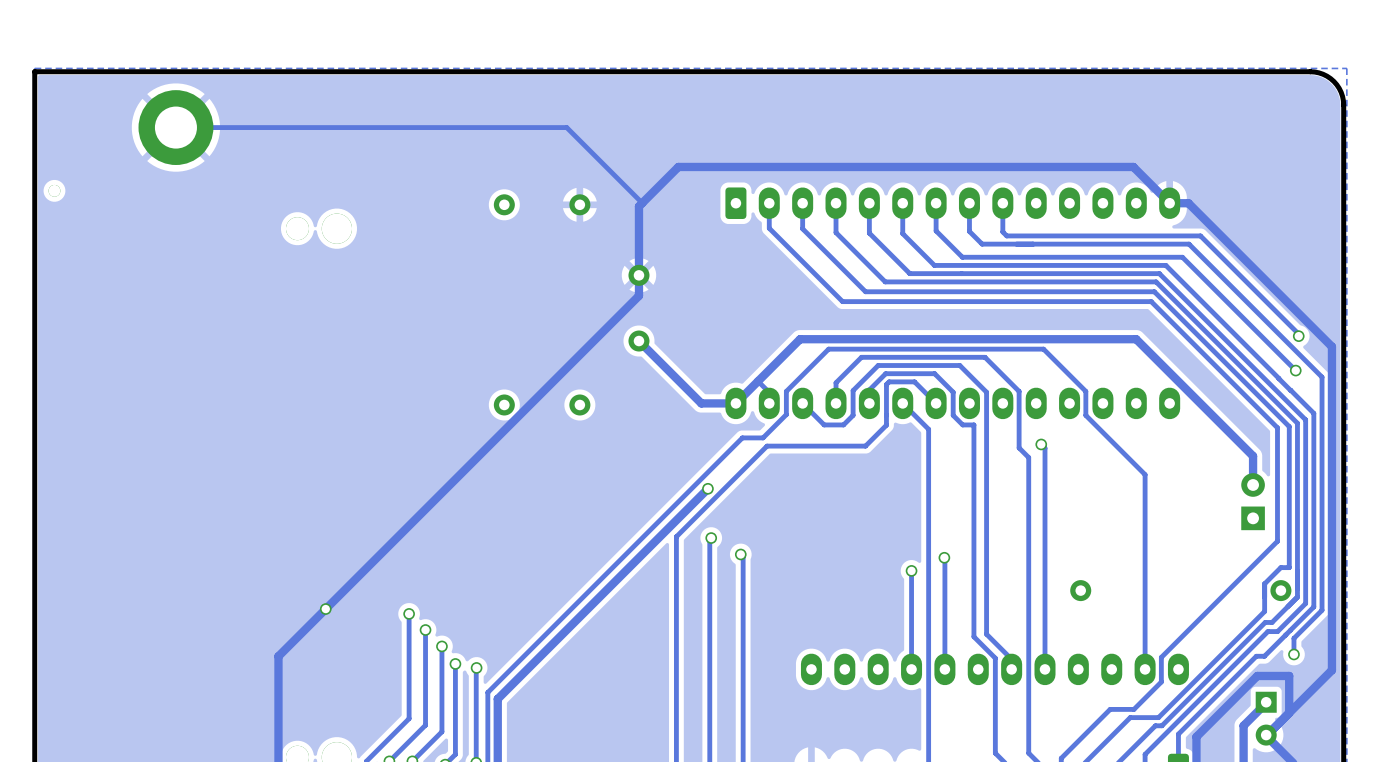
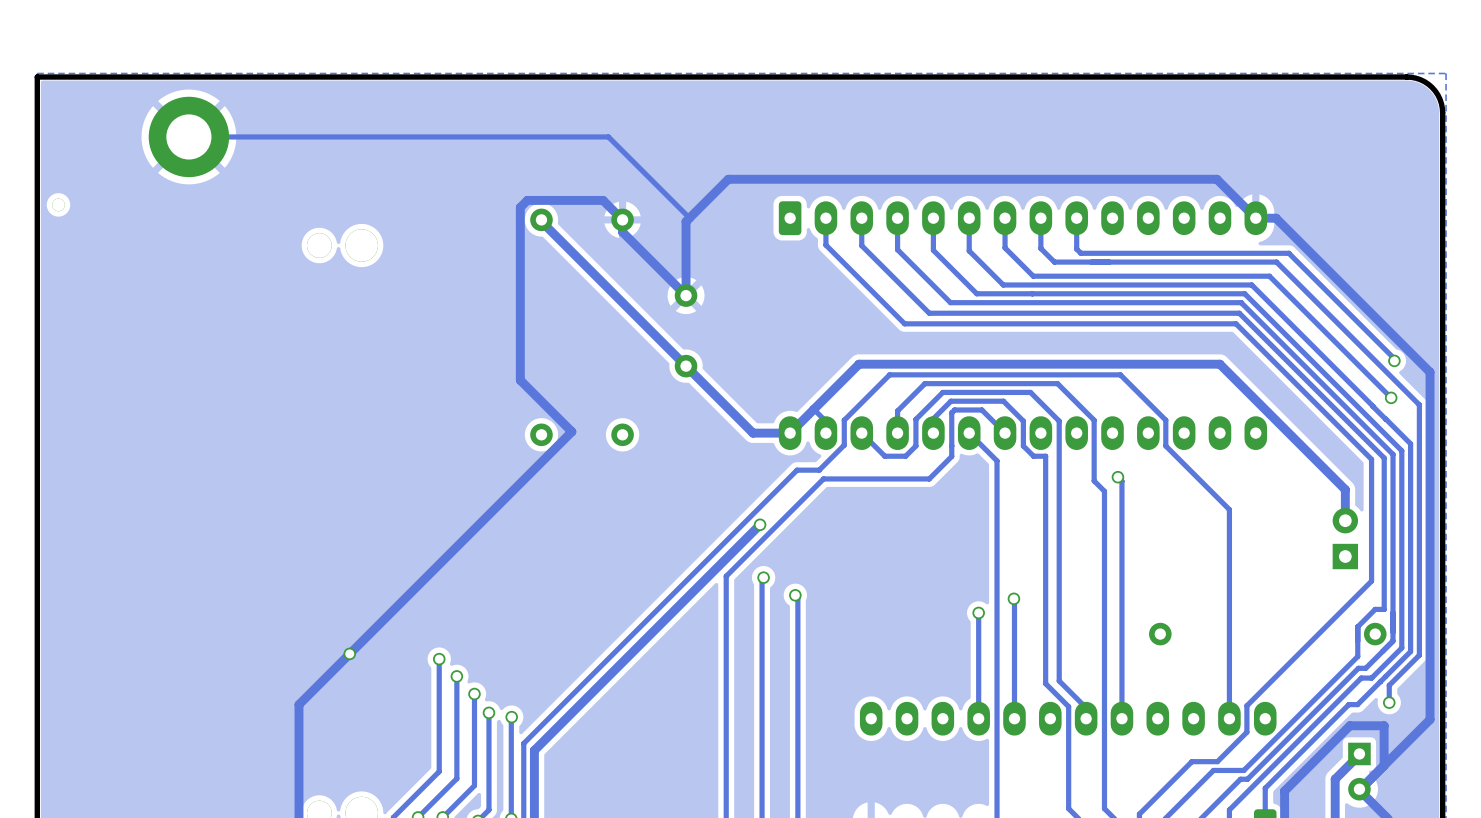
track: none -> (541, 219) (686, 366)
track: (638, 275) (638, 295) (532, 402) -> (686, 295) (622, 232) (622, 219) (603, 200) (527, 200) (520, 207) (520, 380) (571, 431)

